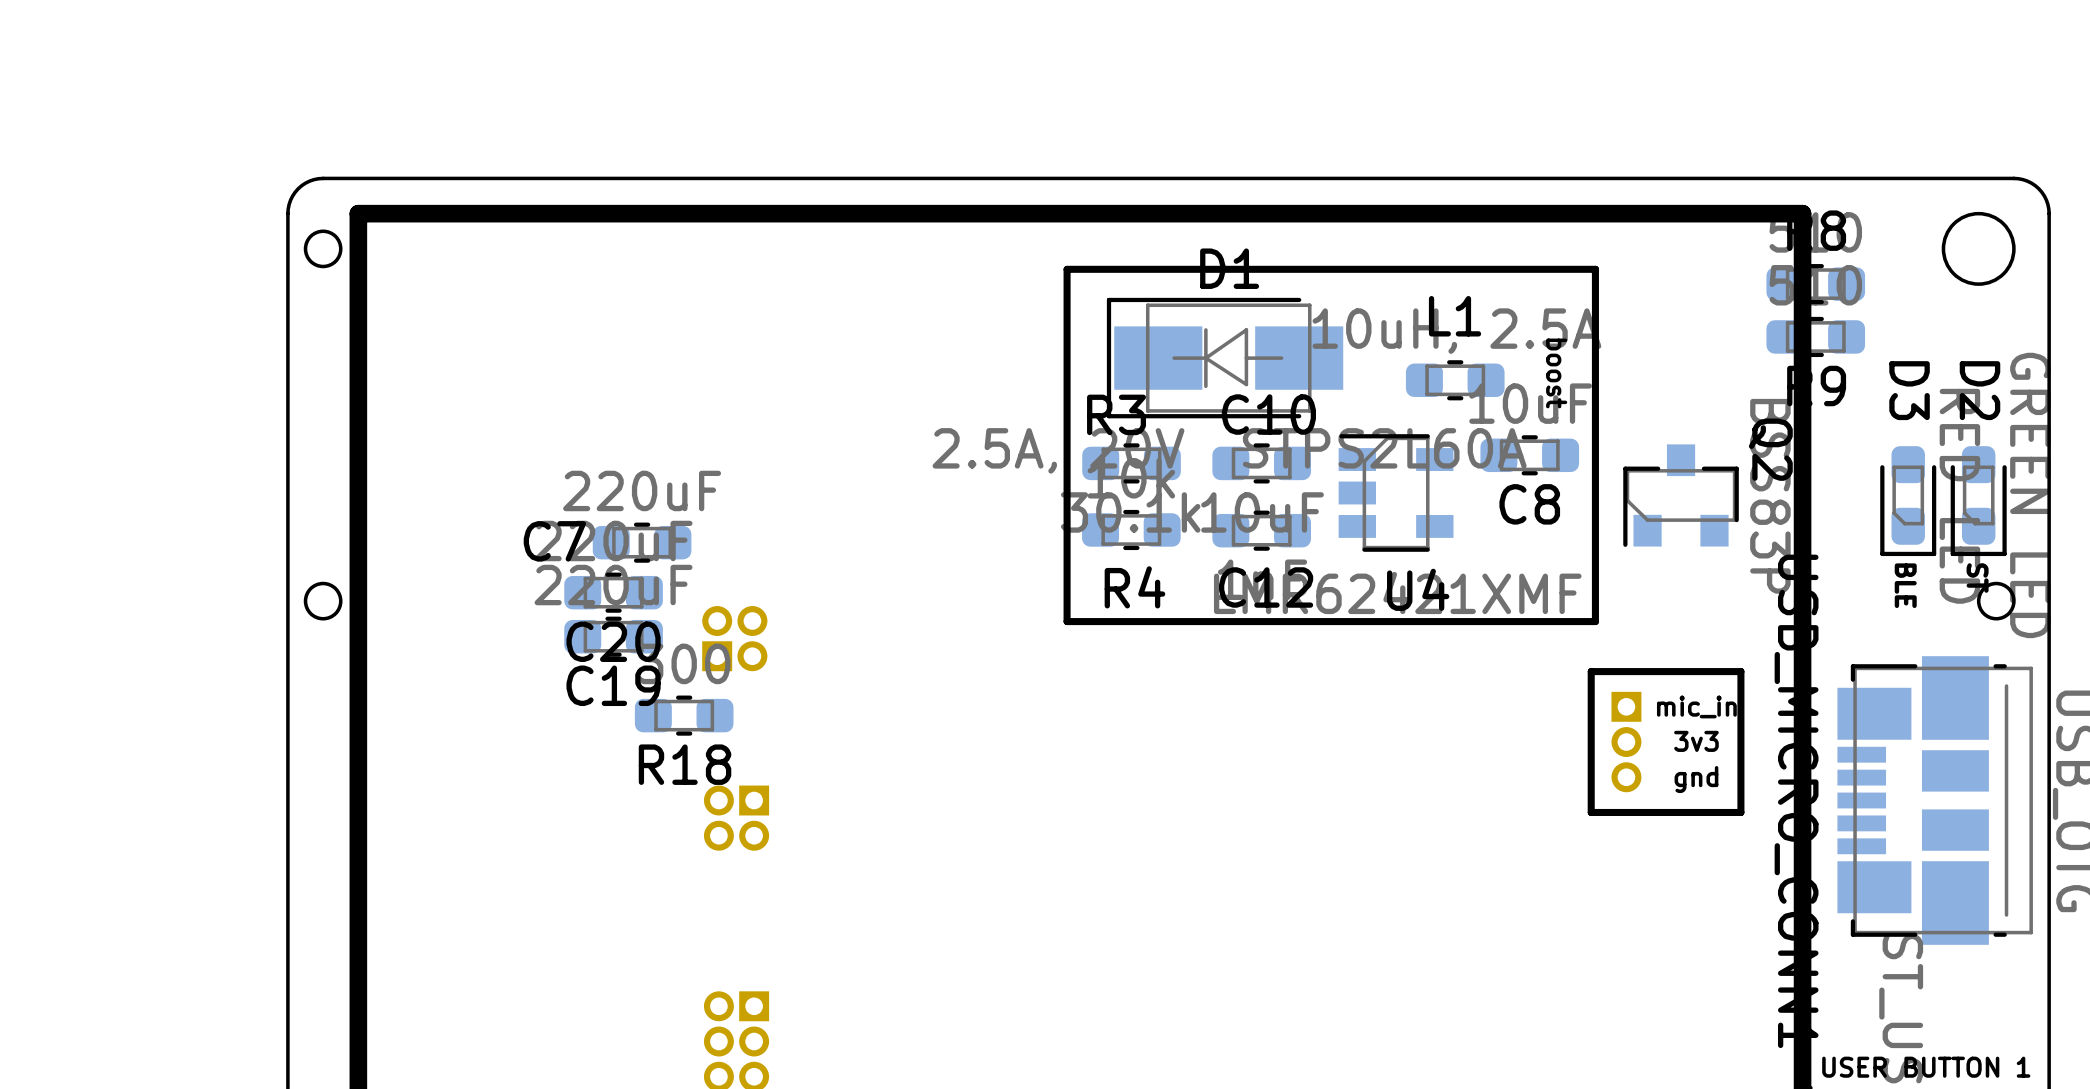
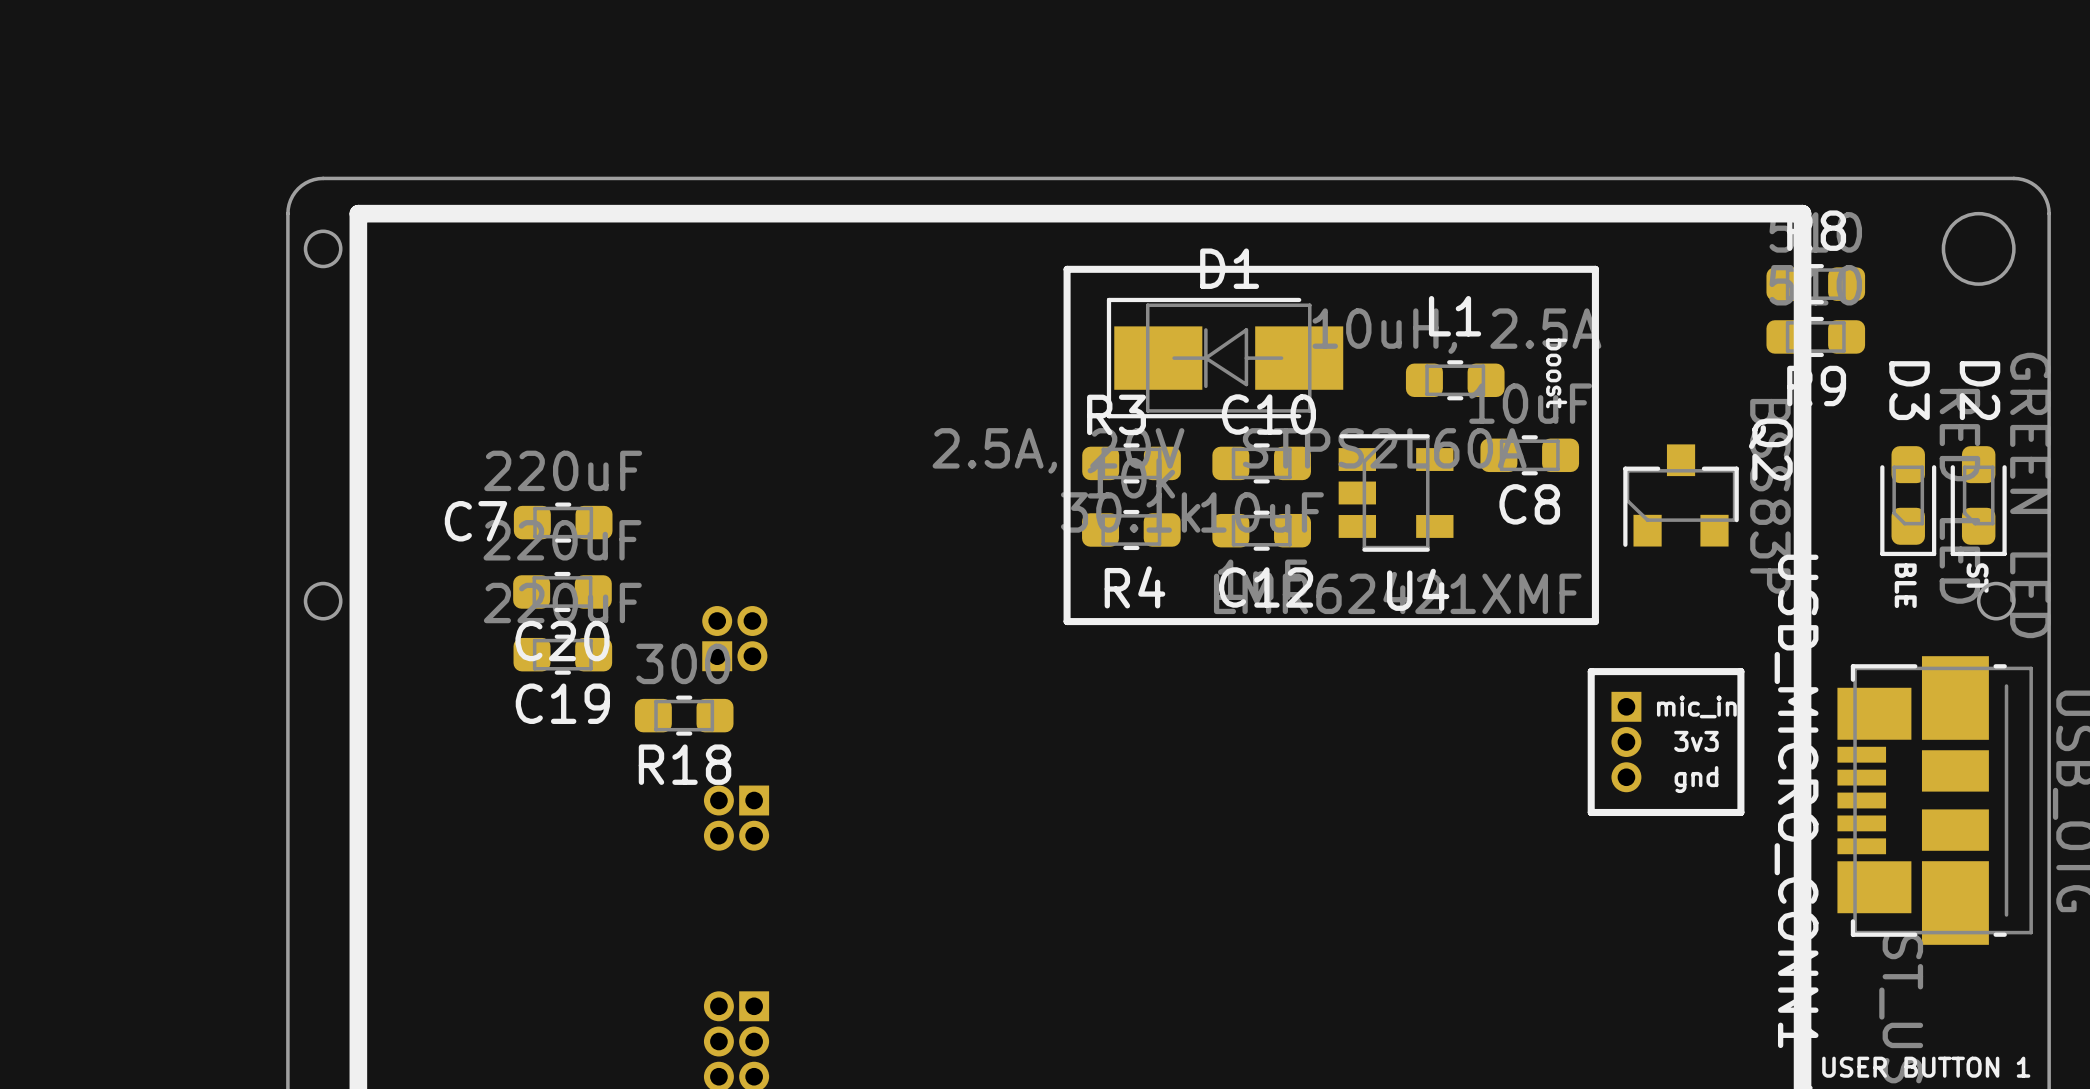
C7 position: (642, 542) -> (563, 522)
C20 position: (613, 592) -> (562, 591)
C19 position: (613, 636) -> (562, 654)

